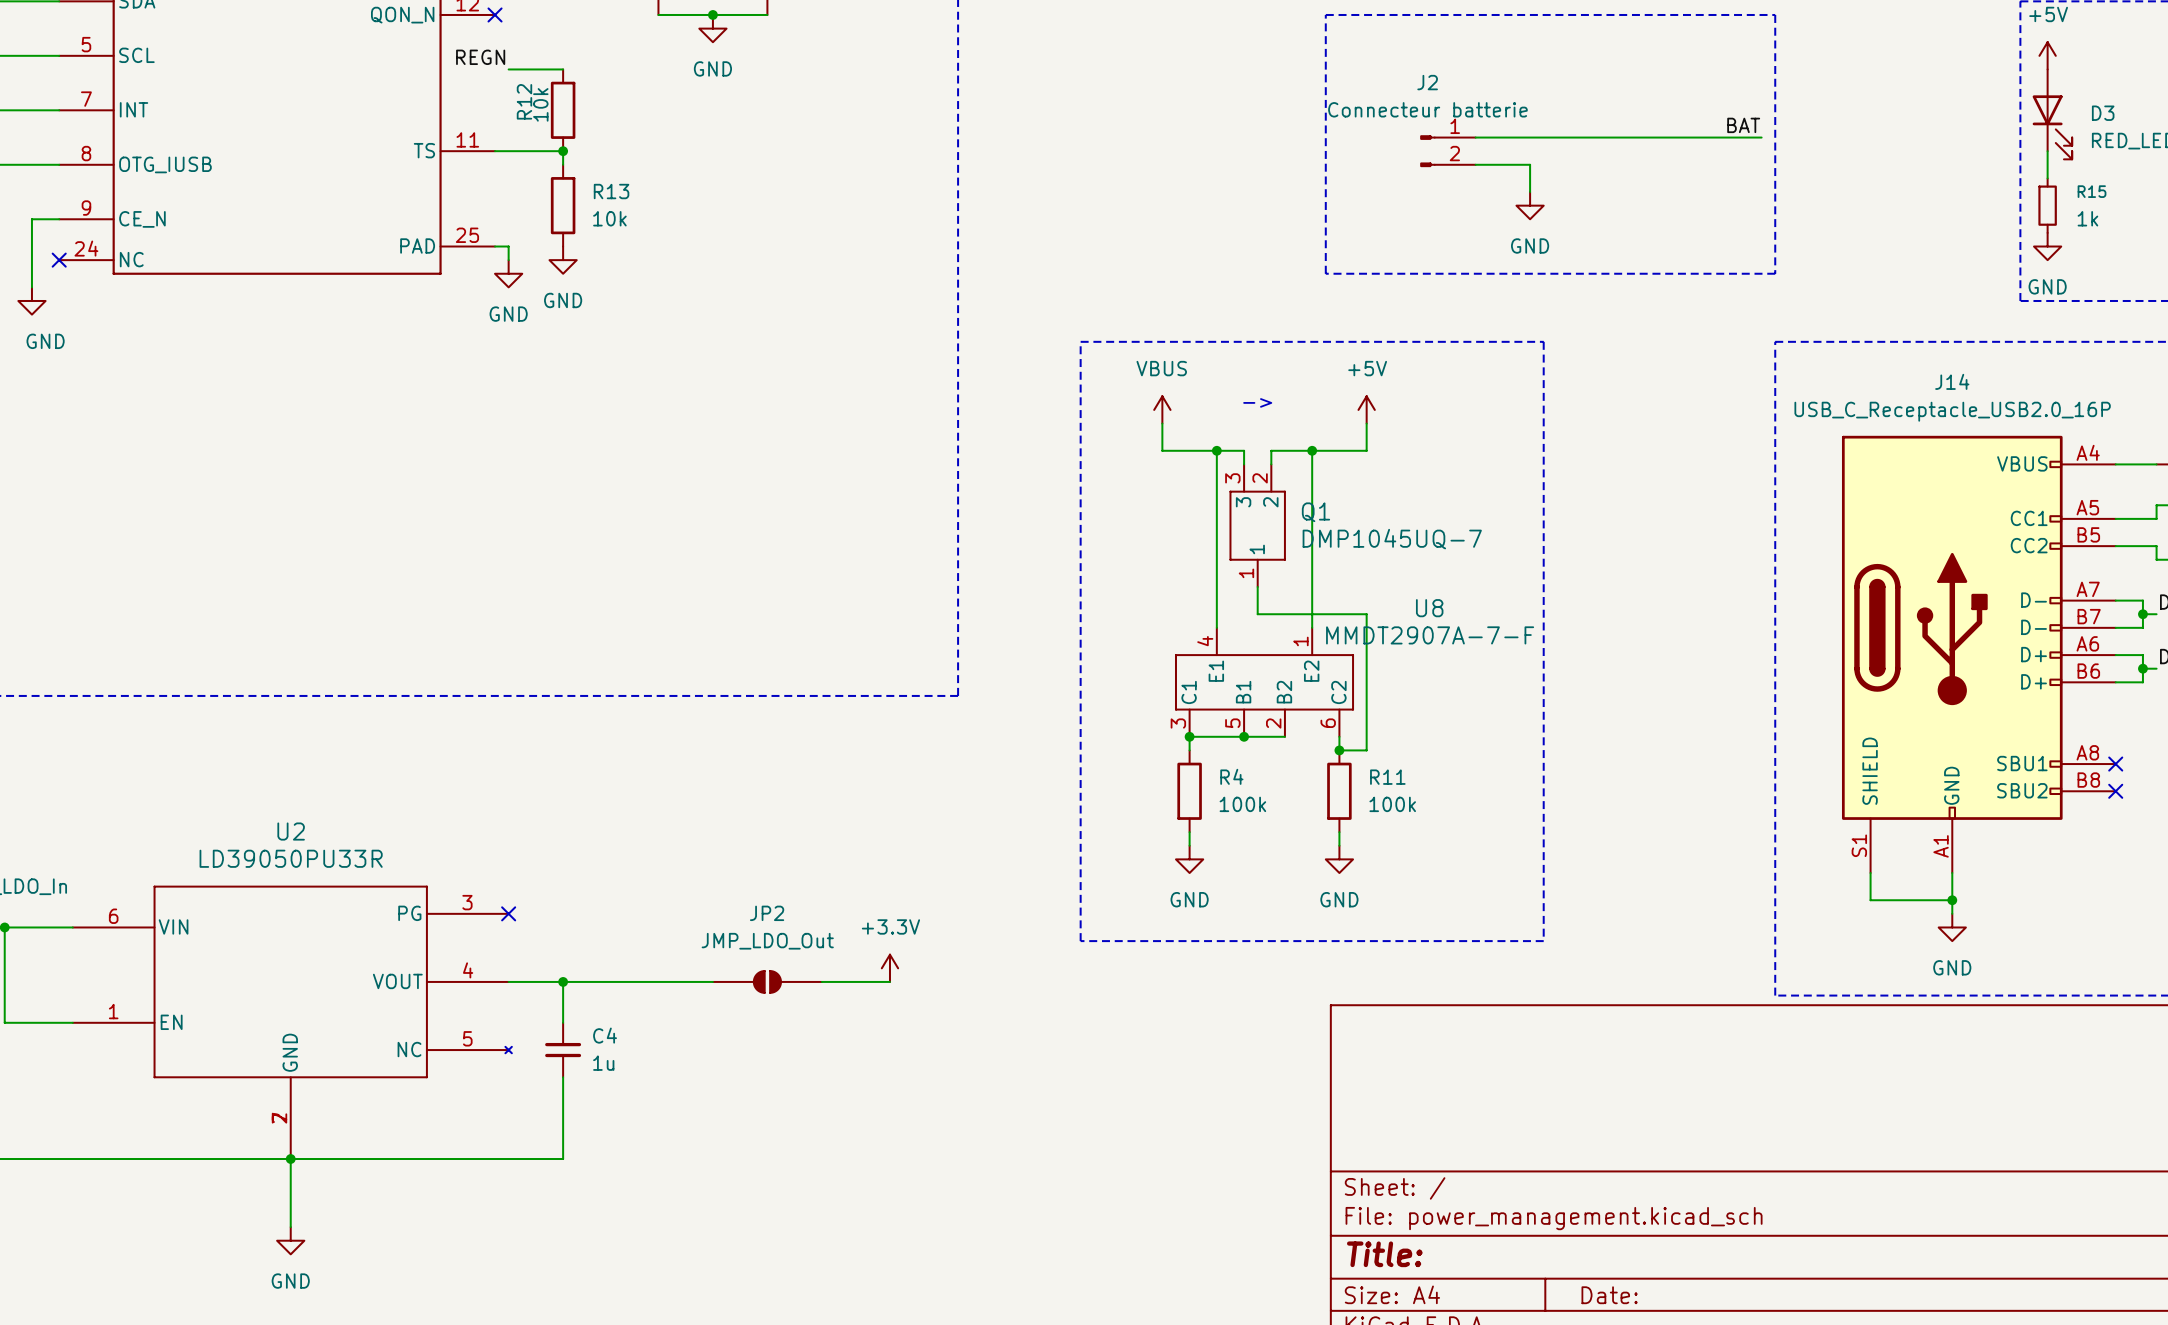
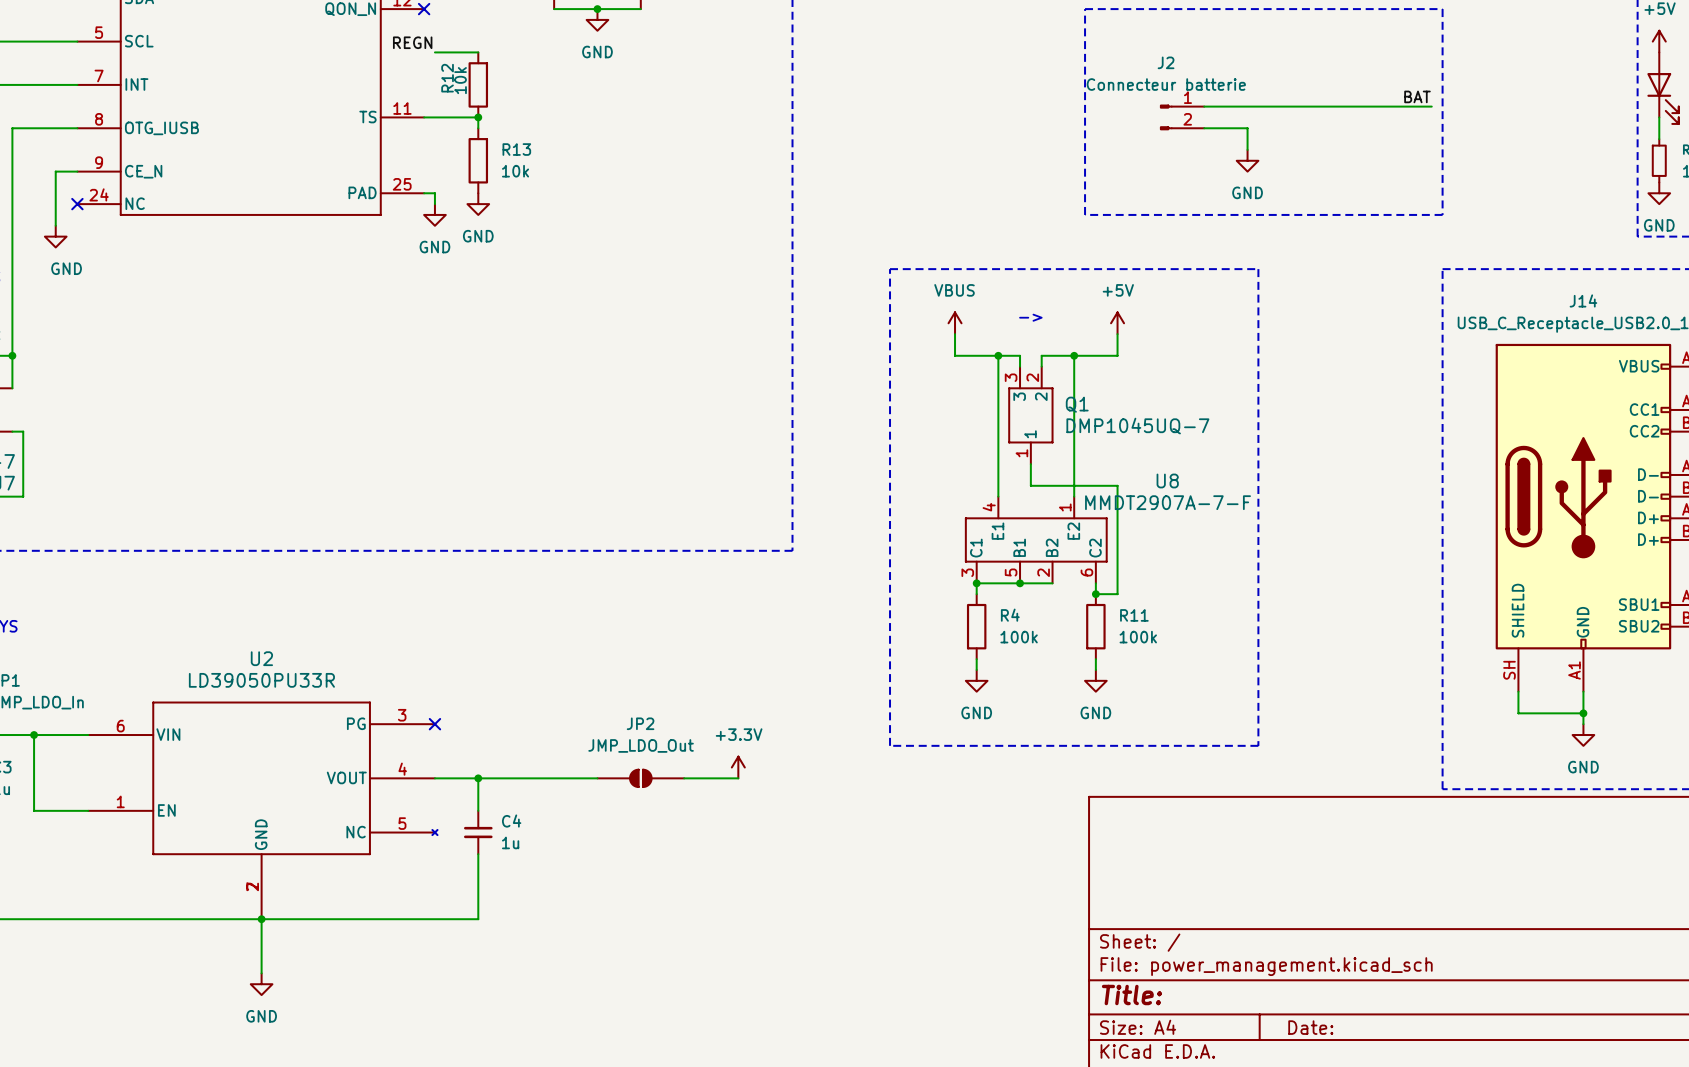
J14 pin number: S1 (1859, 845) -> SH (1509, 670)

